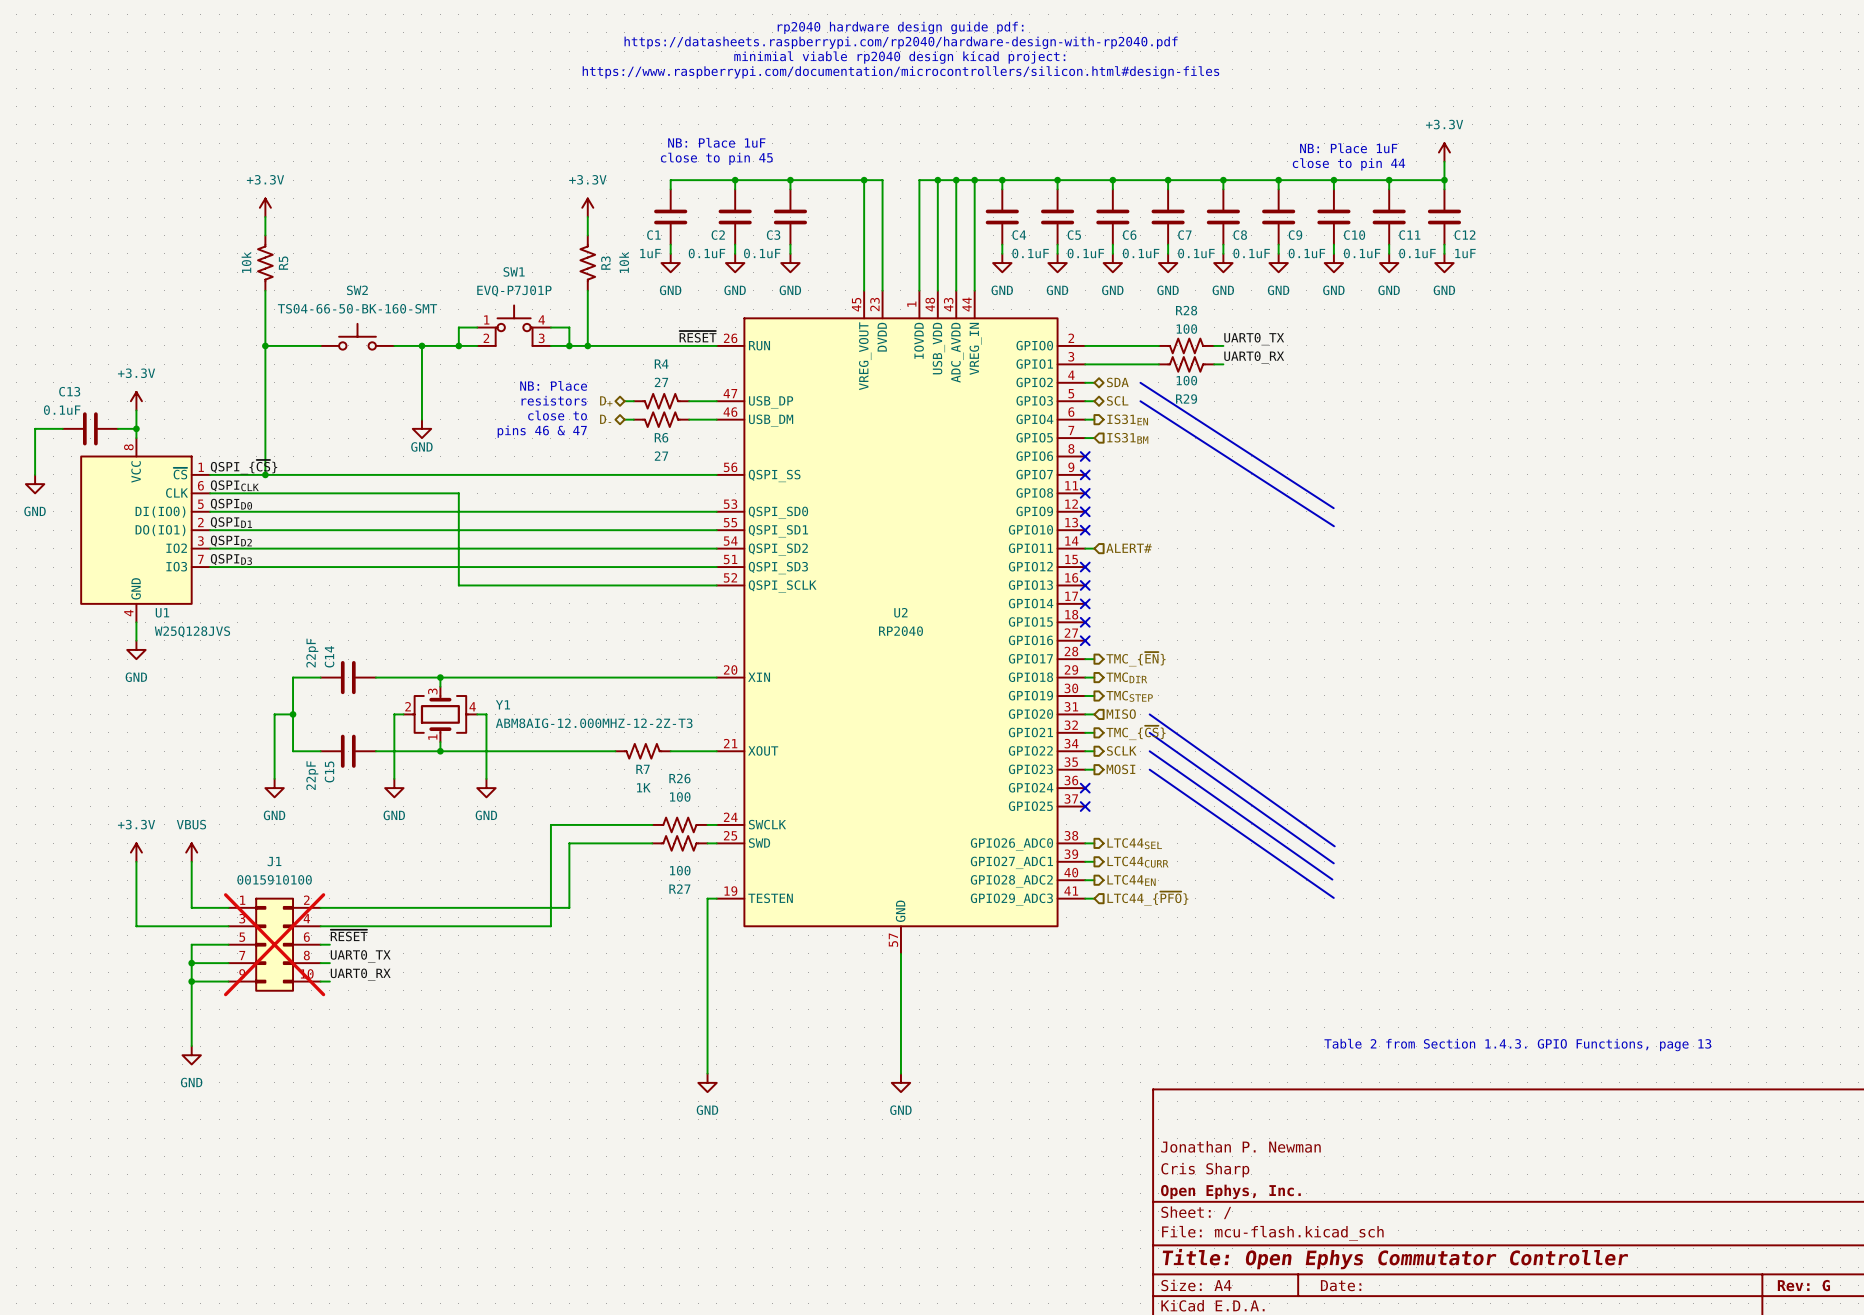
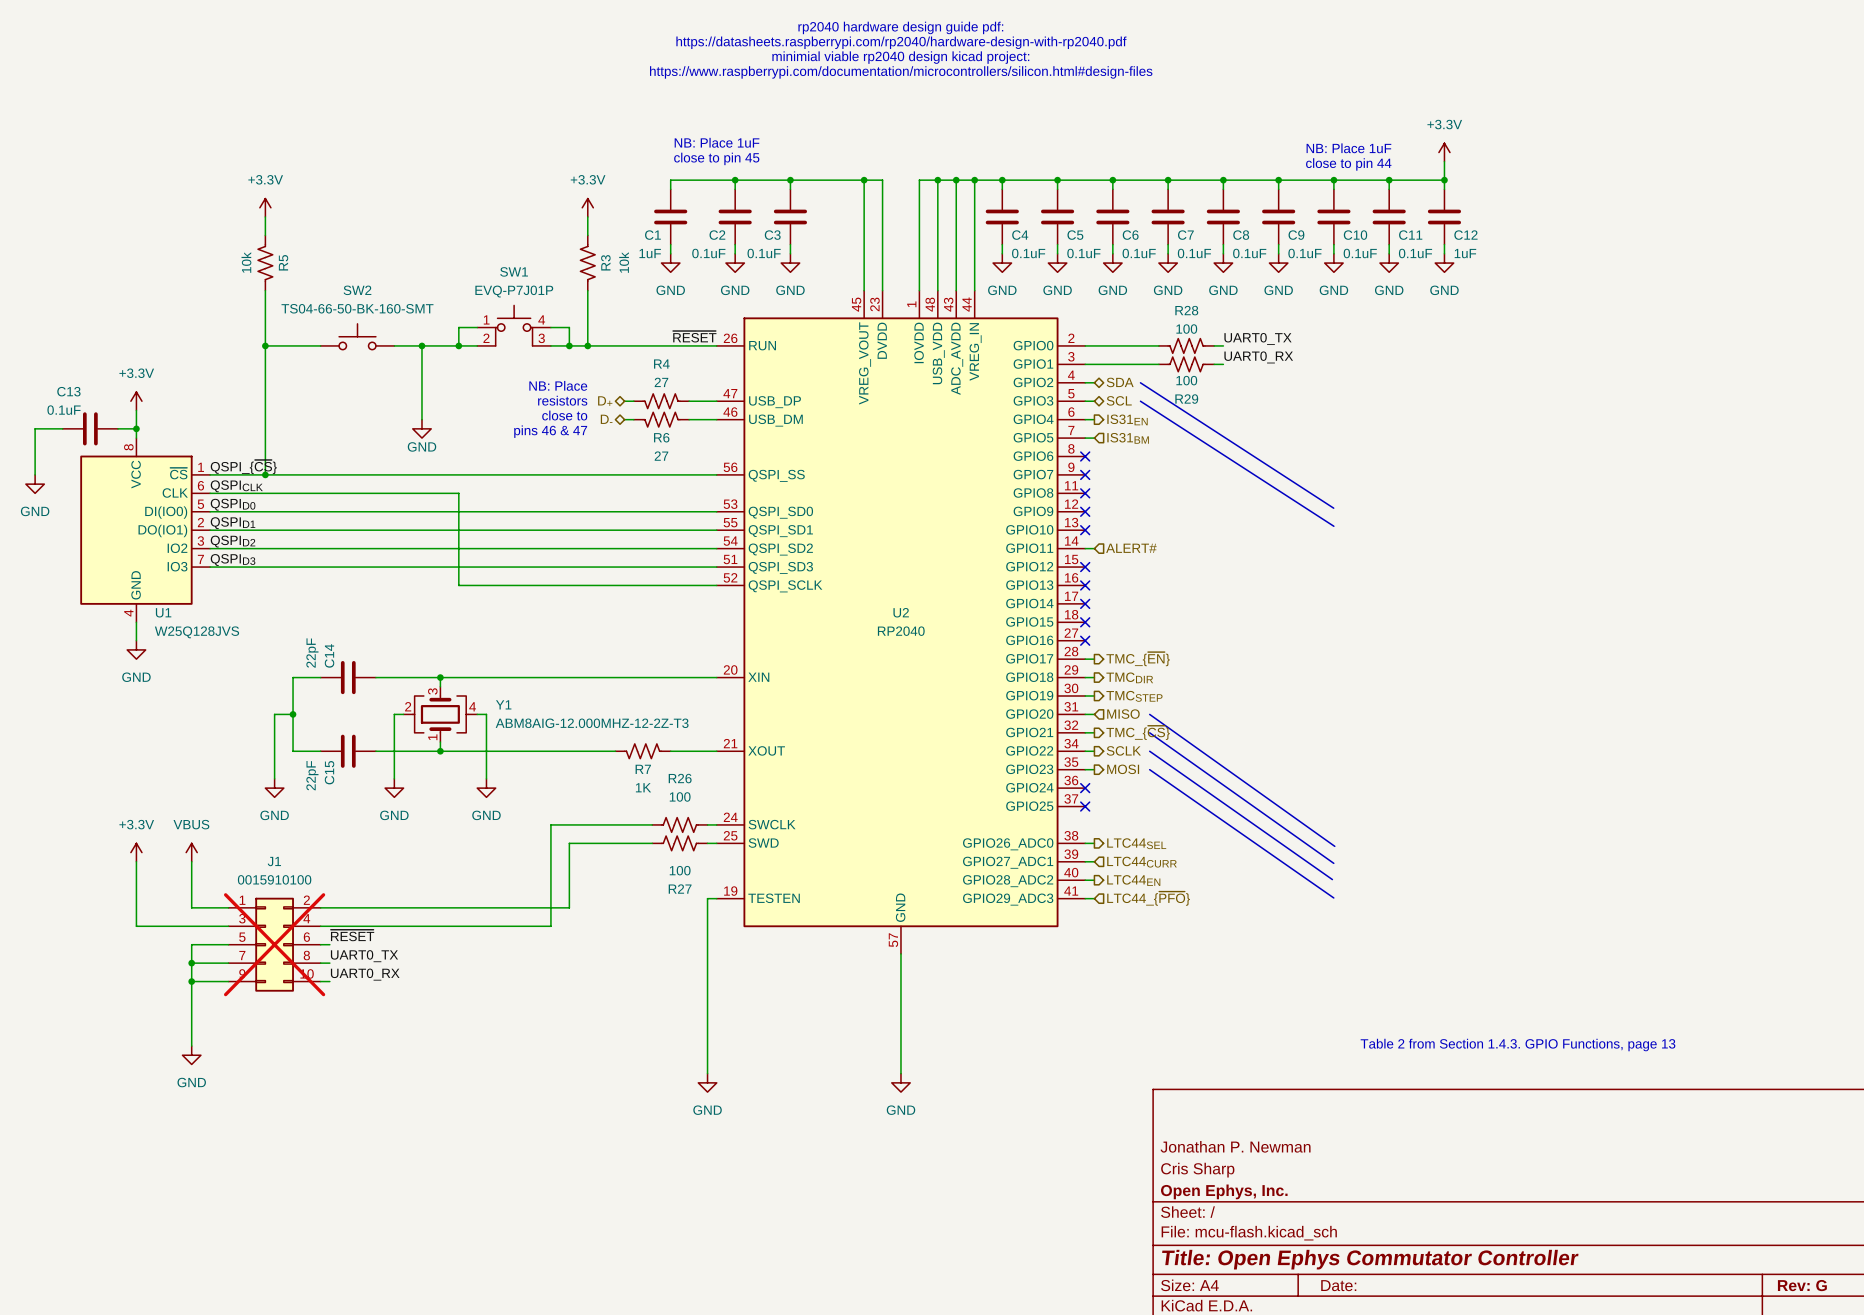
hierarchical label shape: output (1137, 862) -> input (1141, 862)

